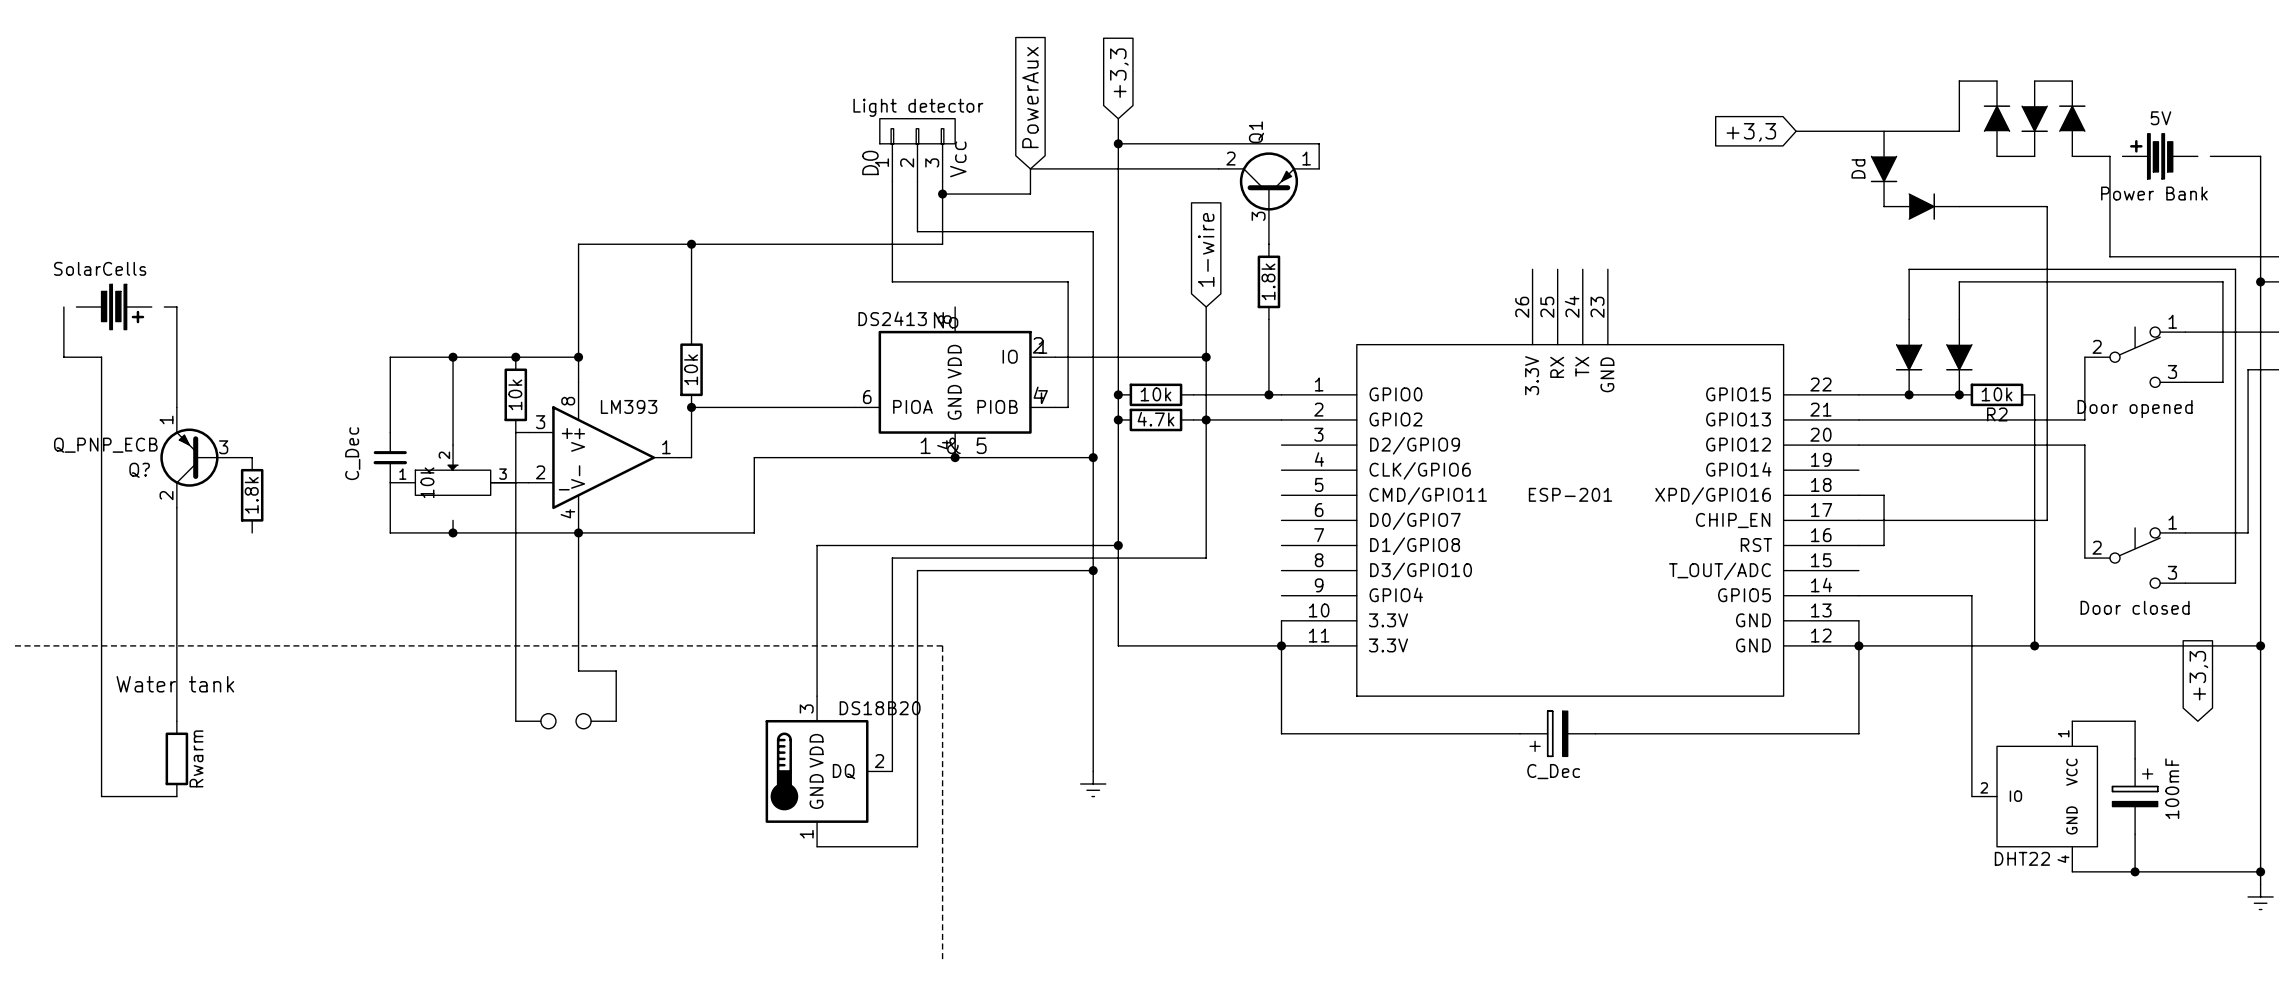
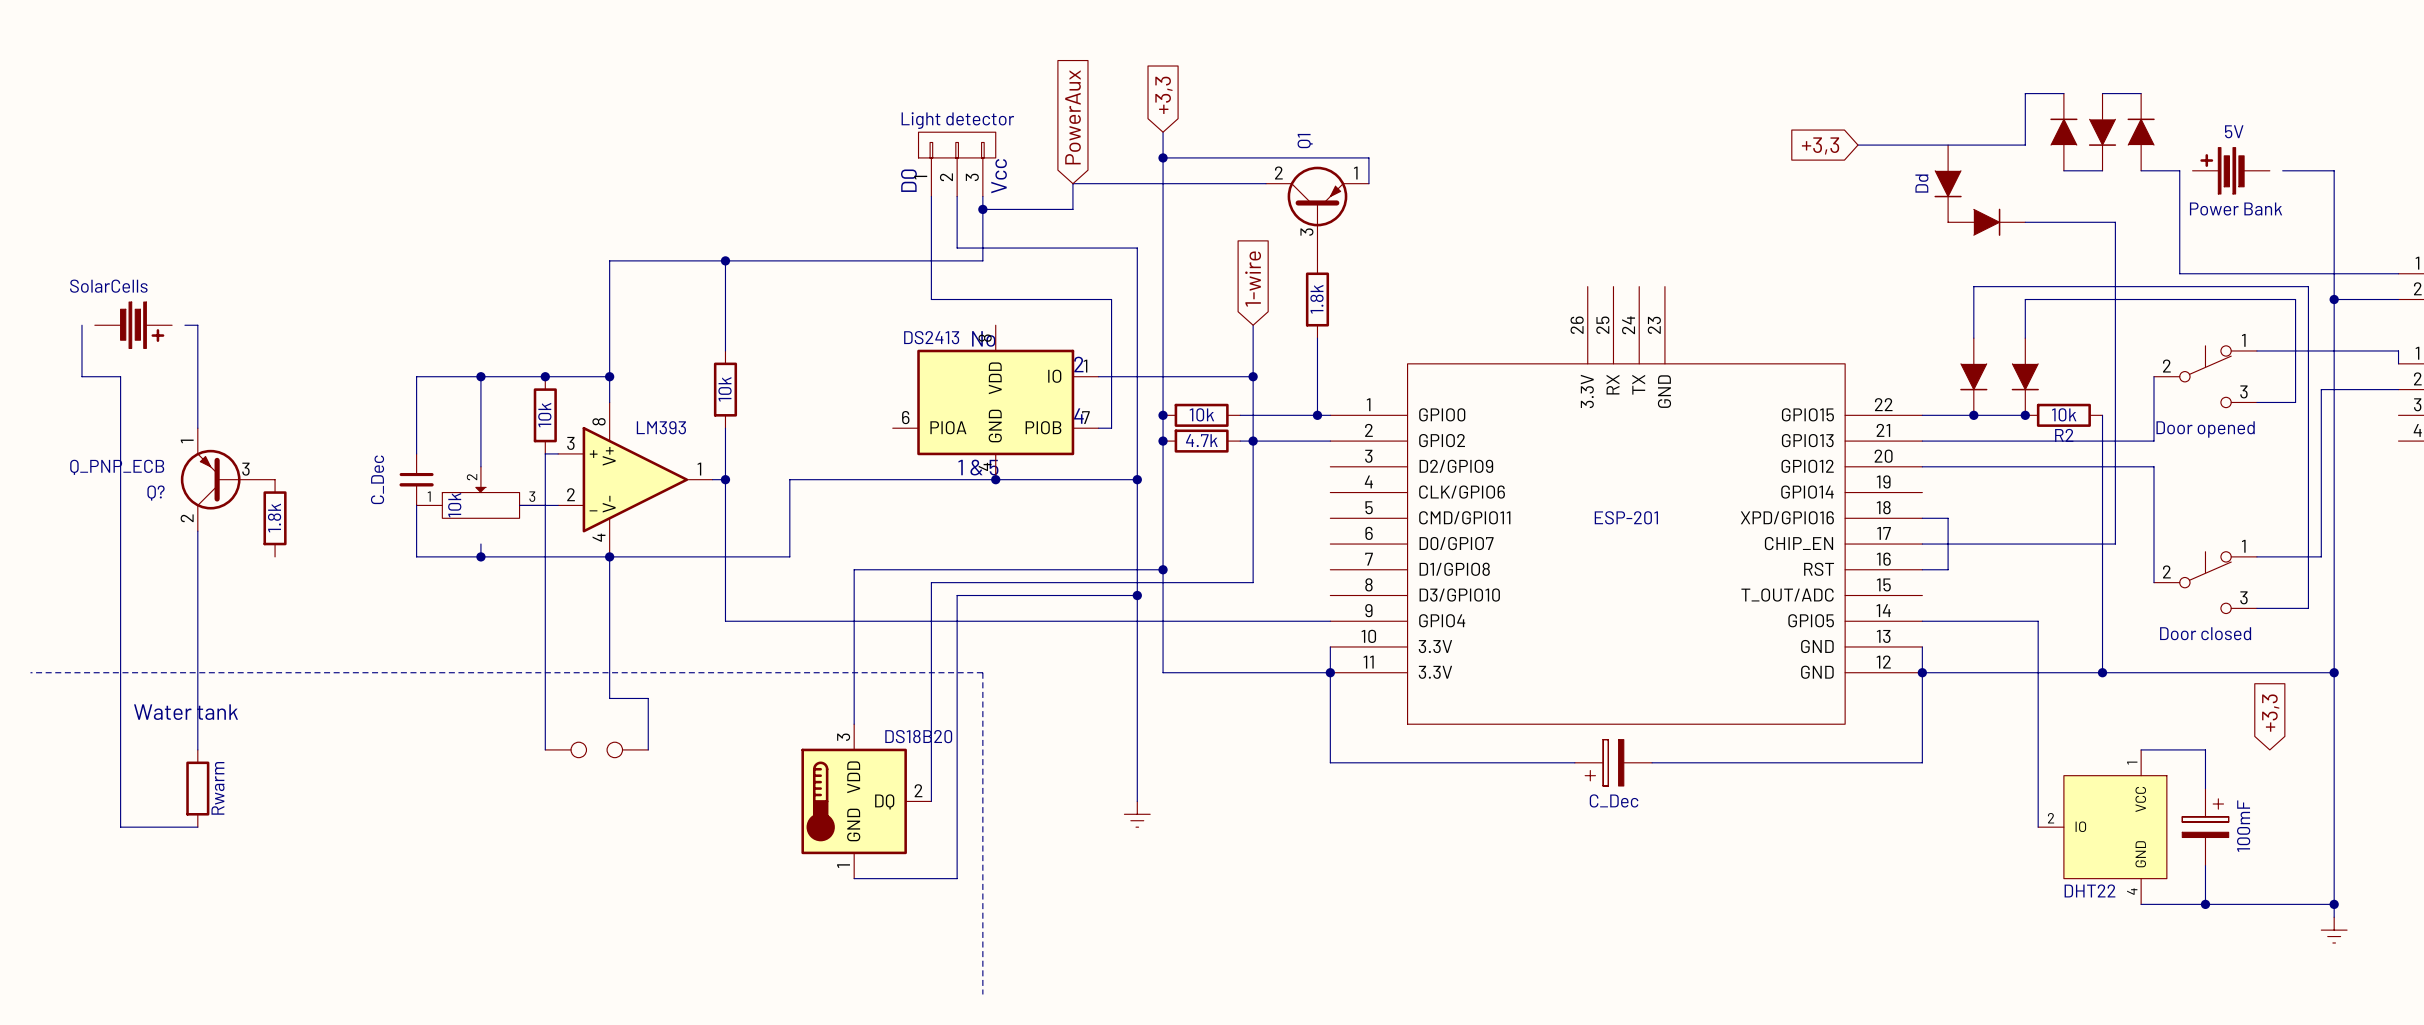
wire: (691, 407) (854, 407) -> none
junction position: (691, 407) -> (725, 479)
wire: none -> (725, 479) (725, 621) (1330, 621)

